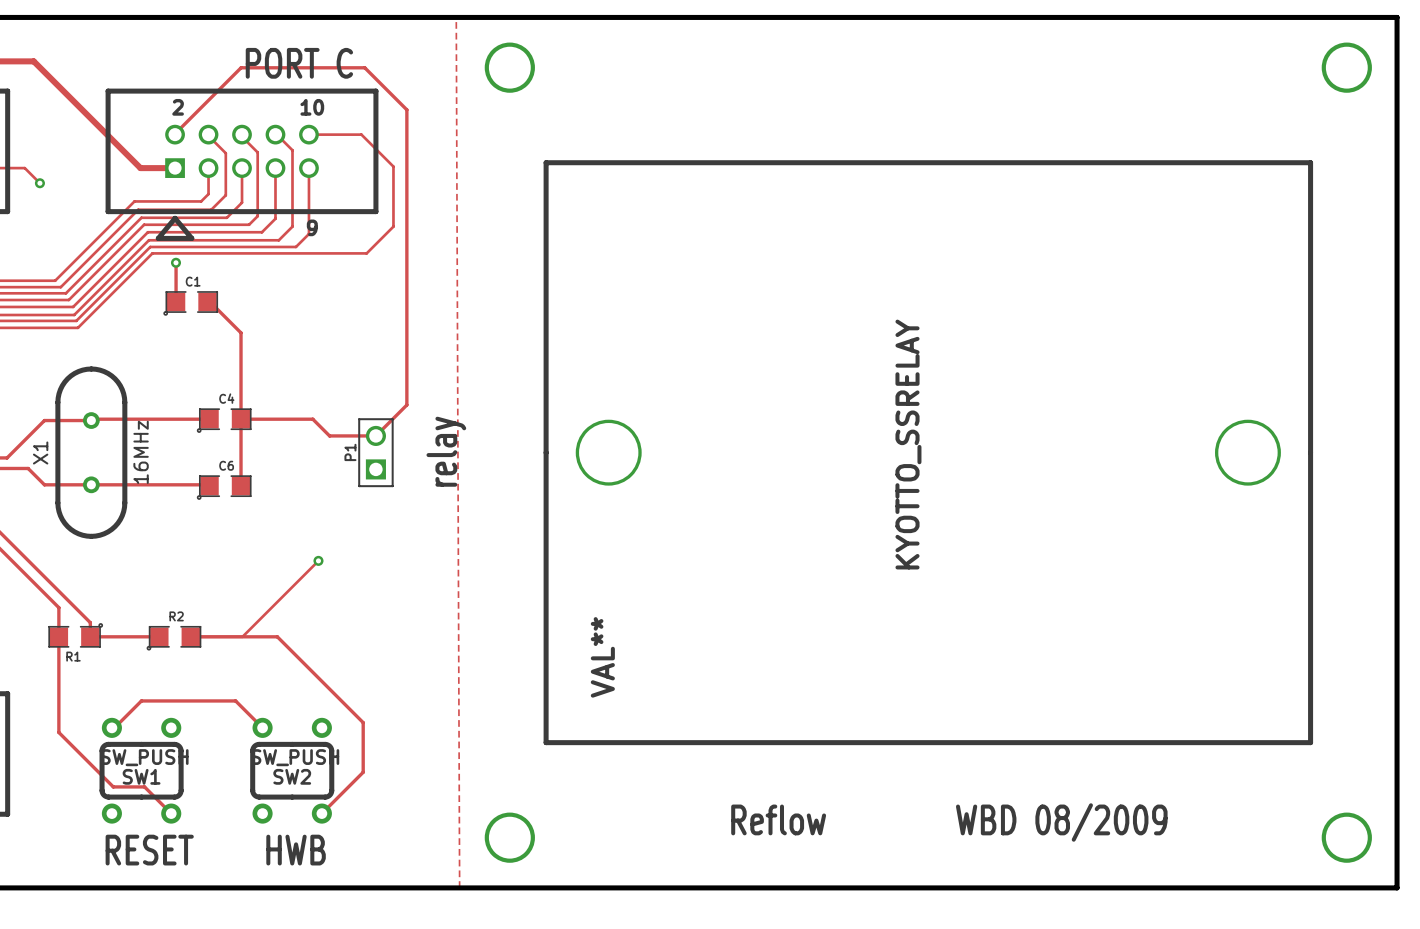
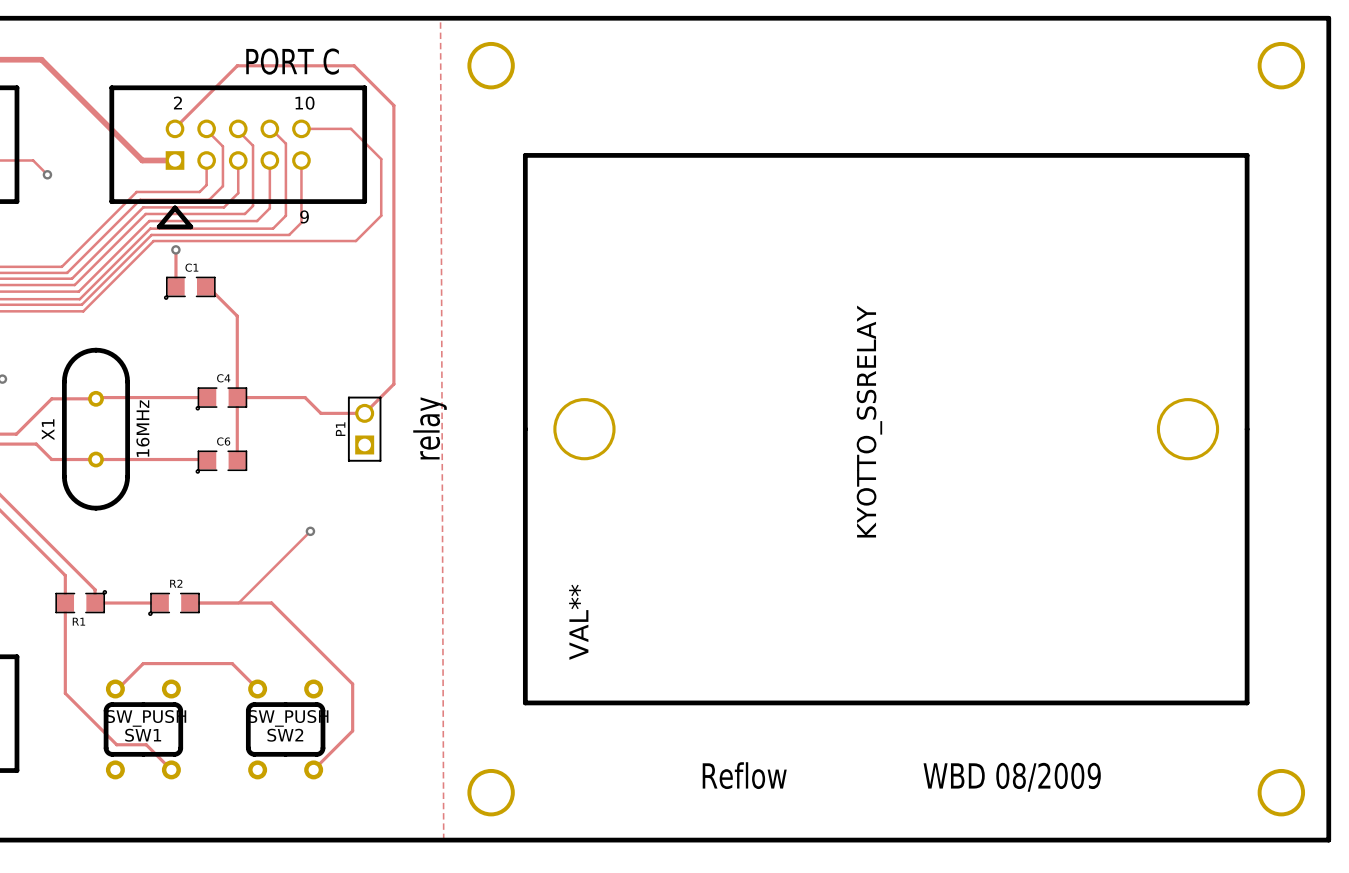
text: RESET (149, 850) -> none
text: HWB (296, 850) -> none

